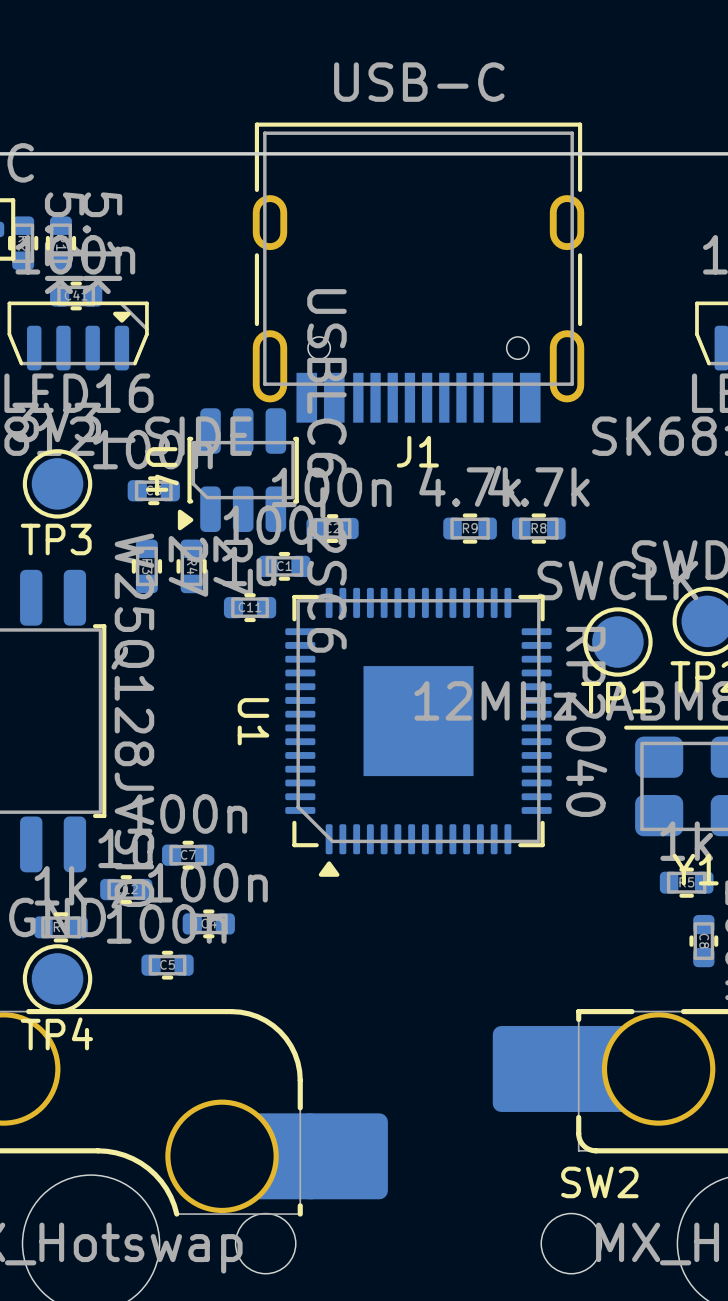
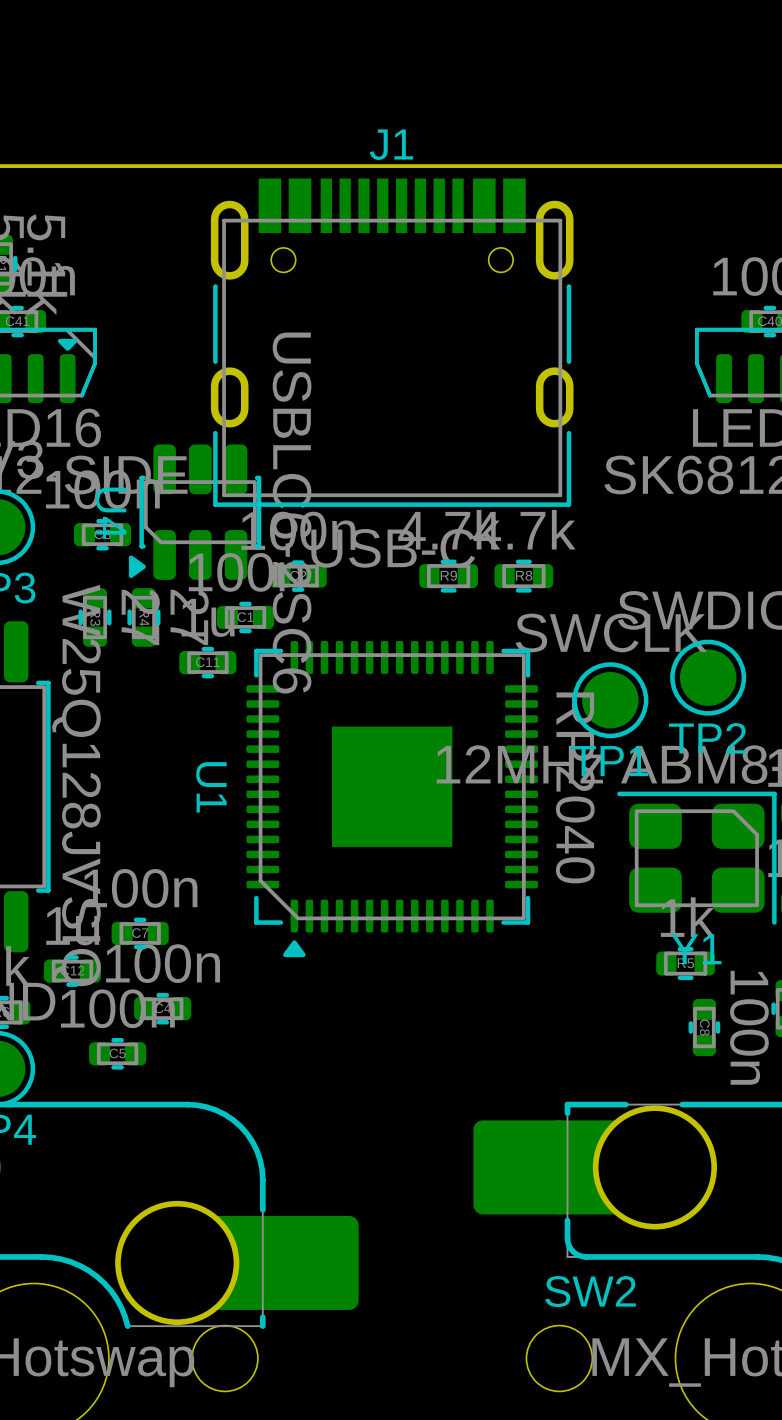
J1 rotation: 0° (418, 272) -> 180° (392, 342)

